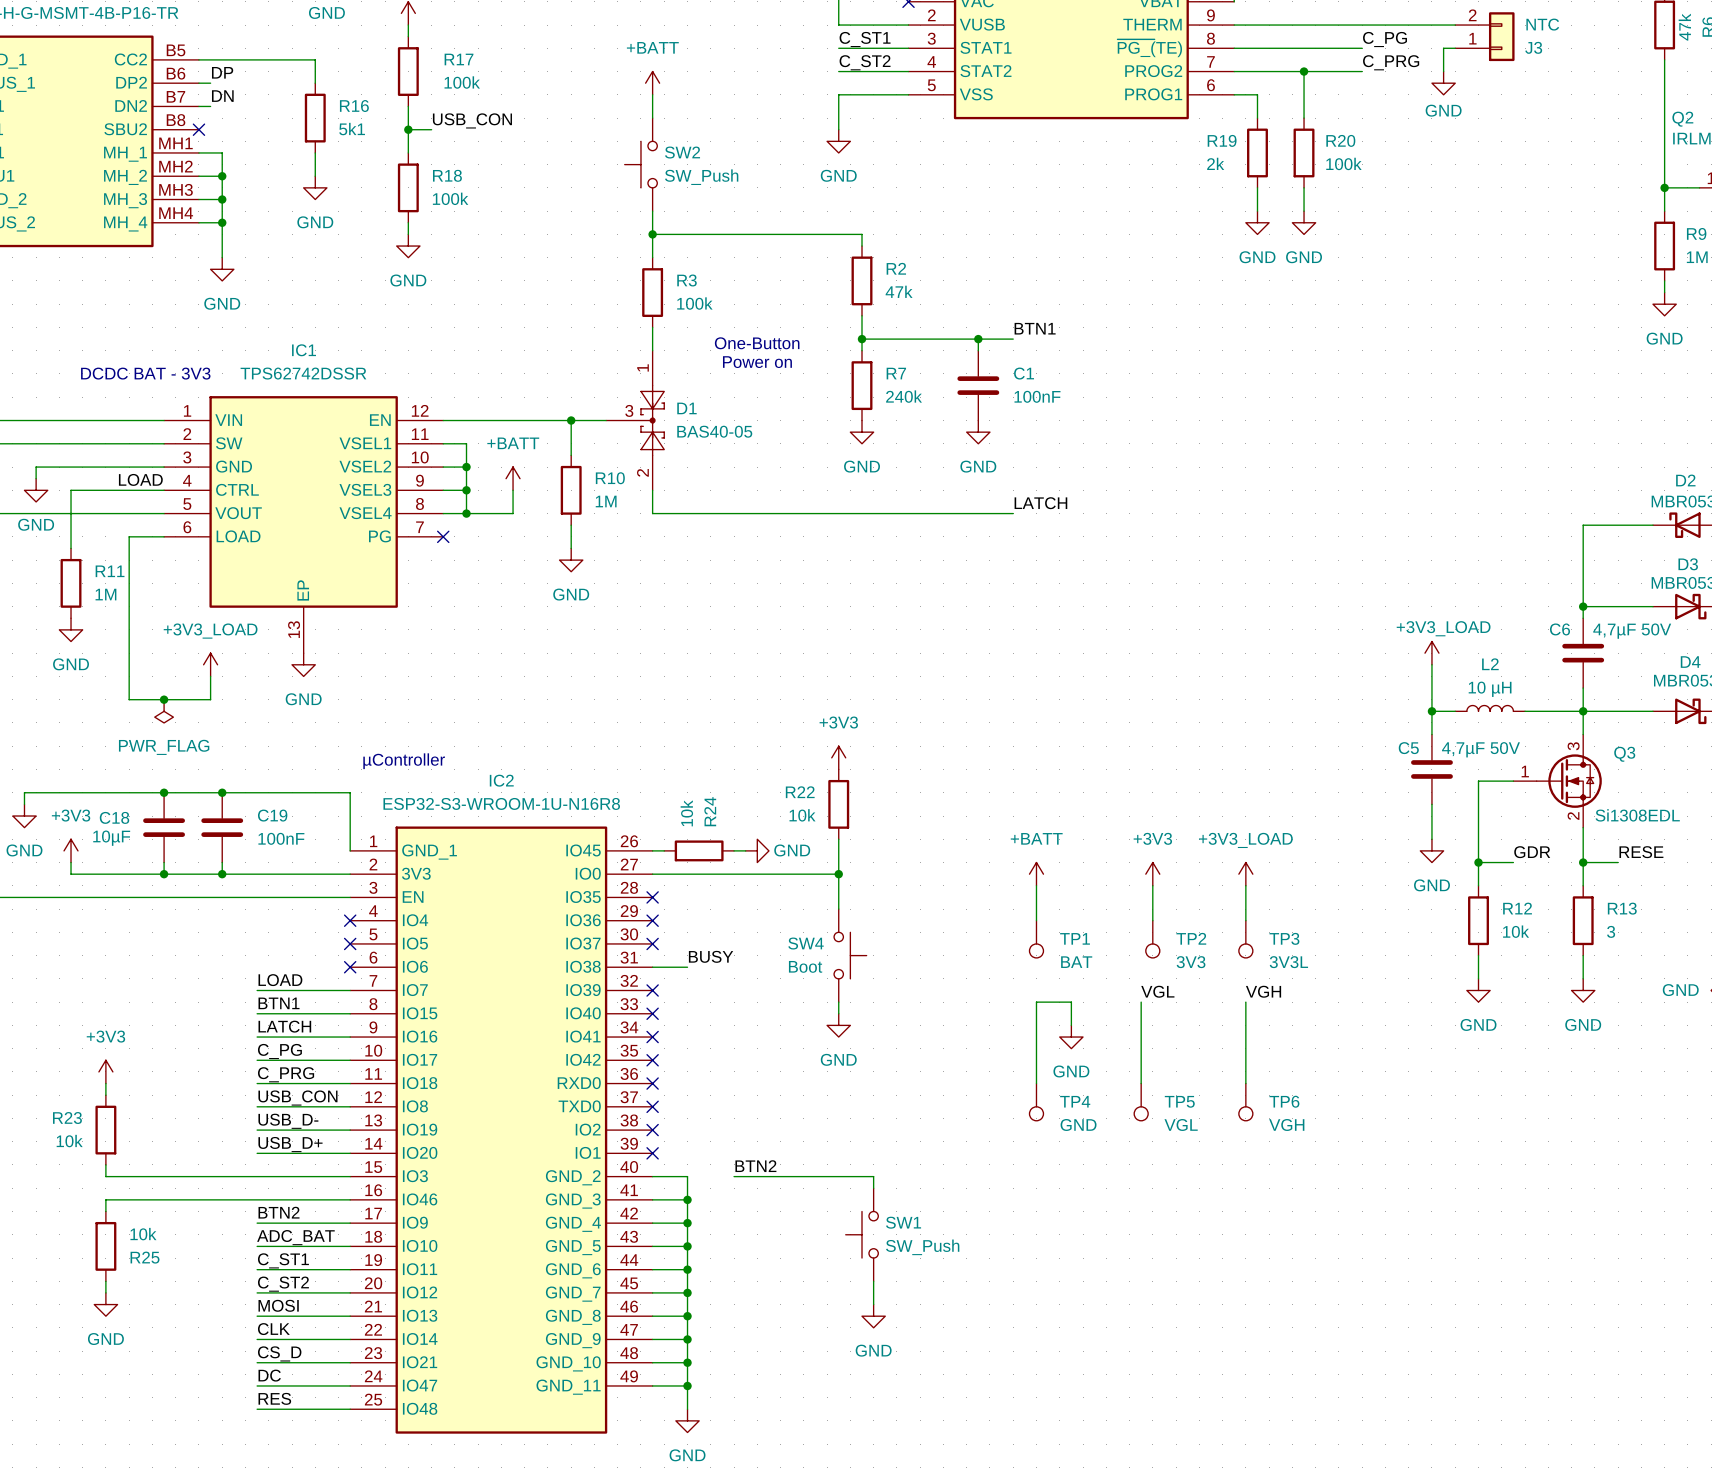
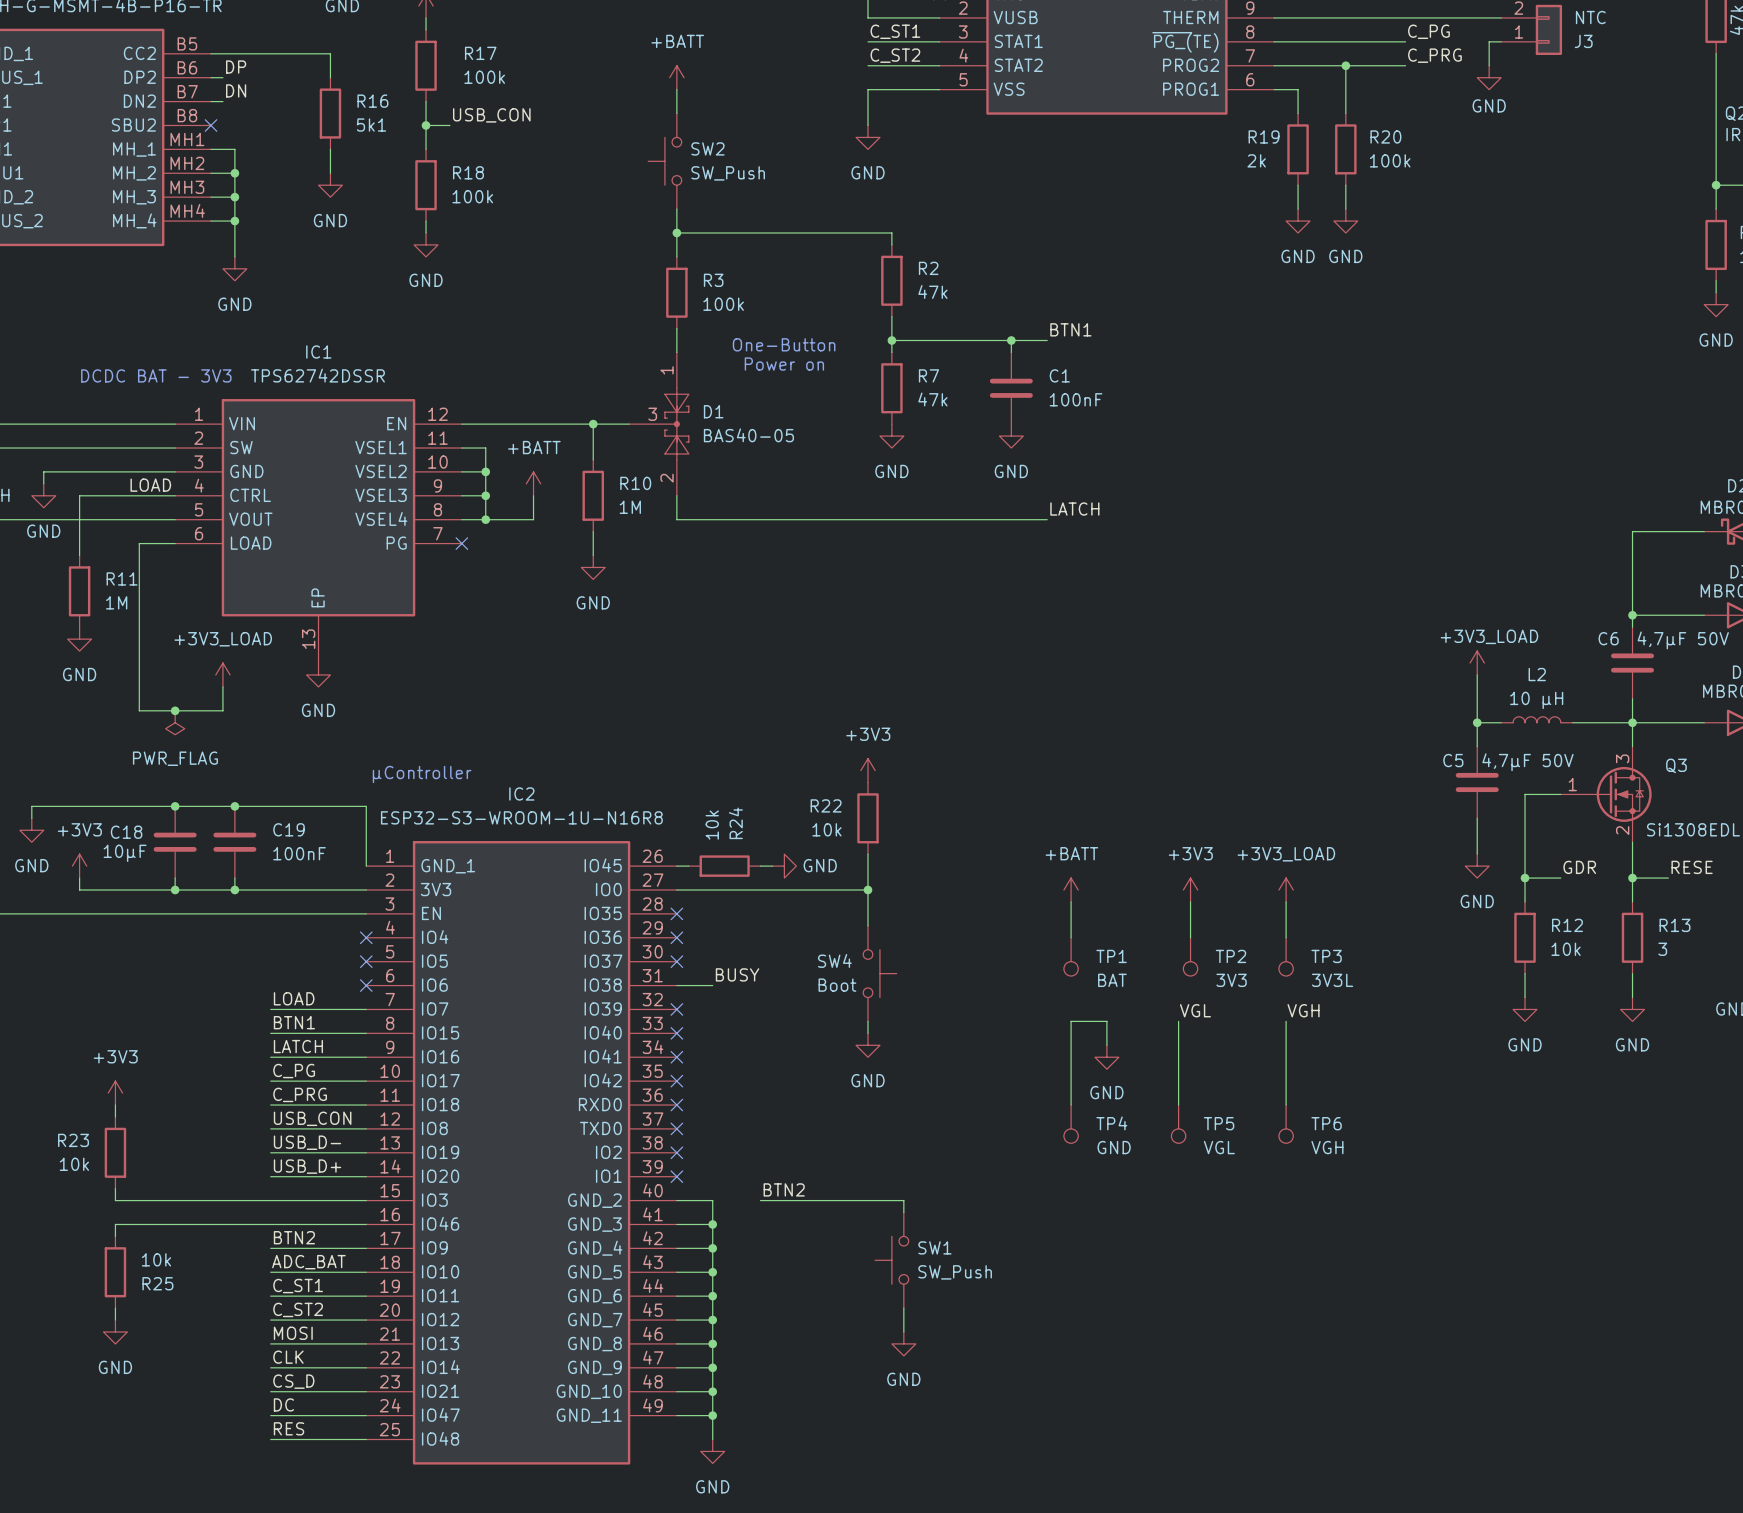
R7 value: 240k (904, 396) -> 47k (932, 399)

